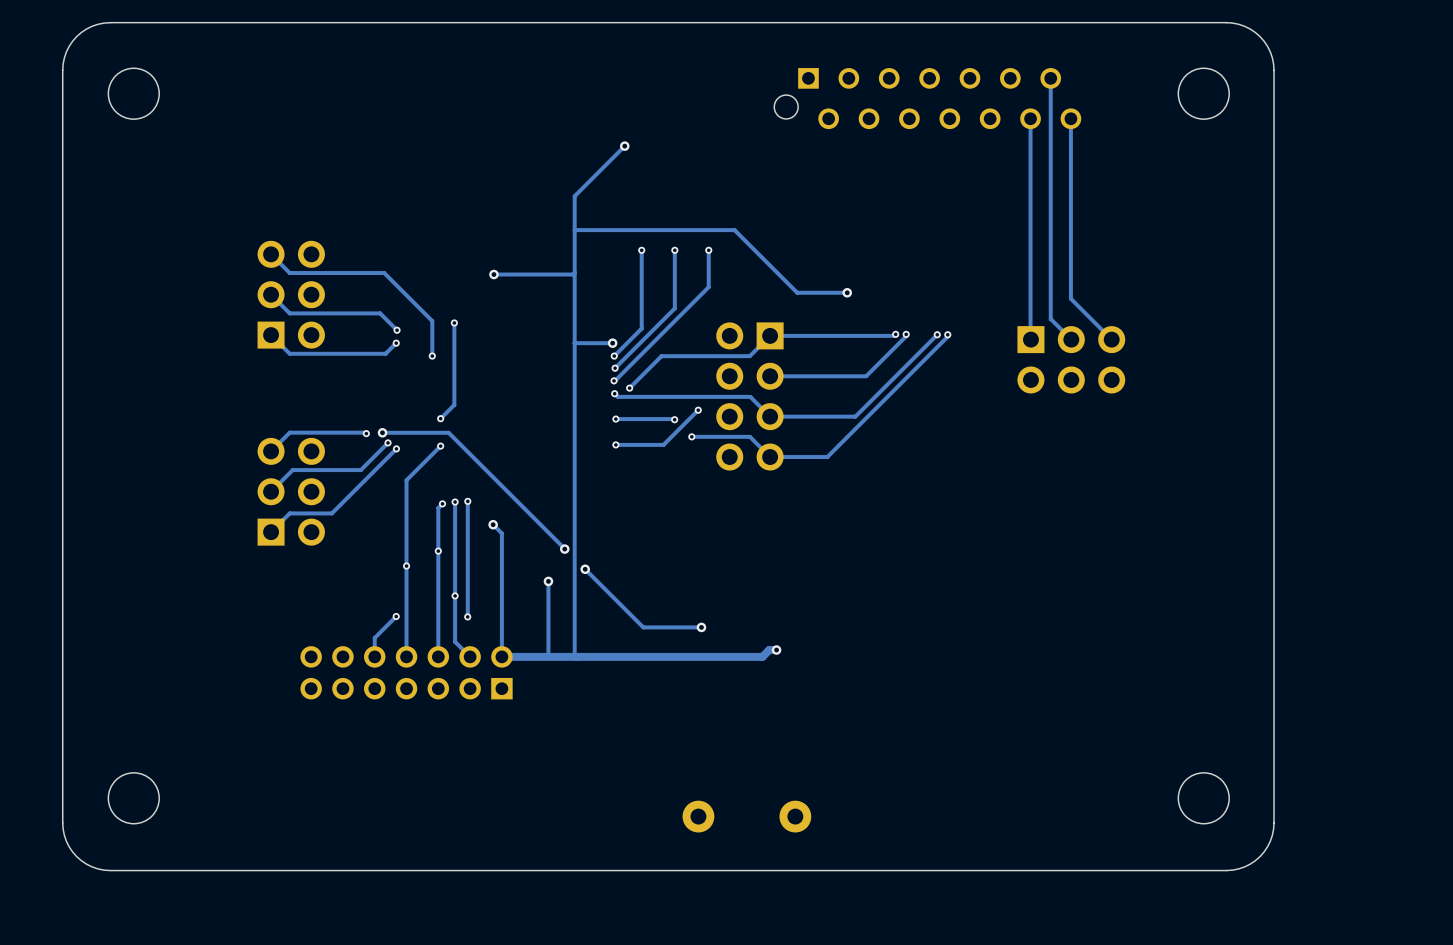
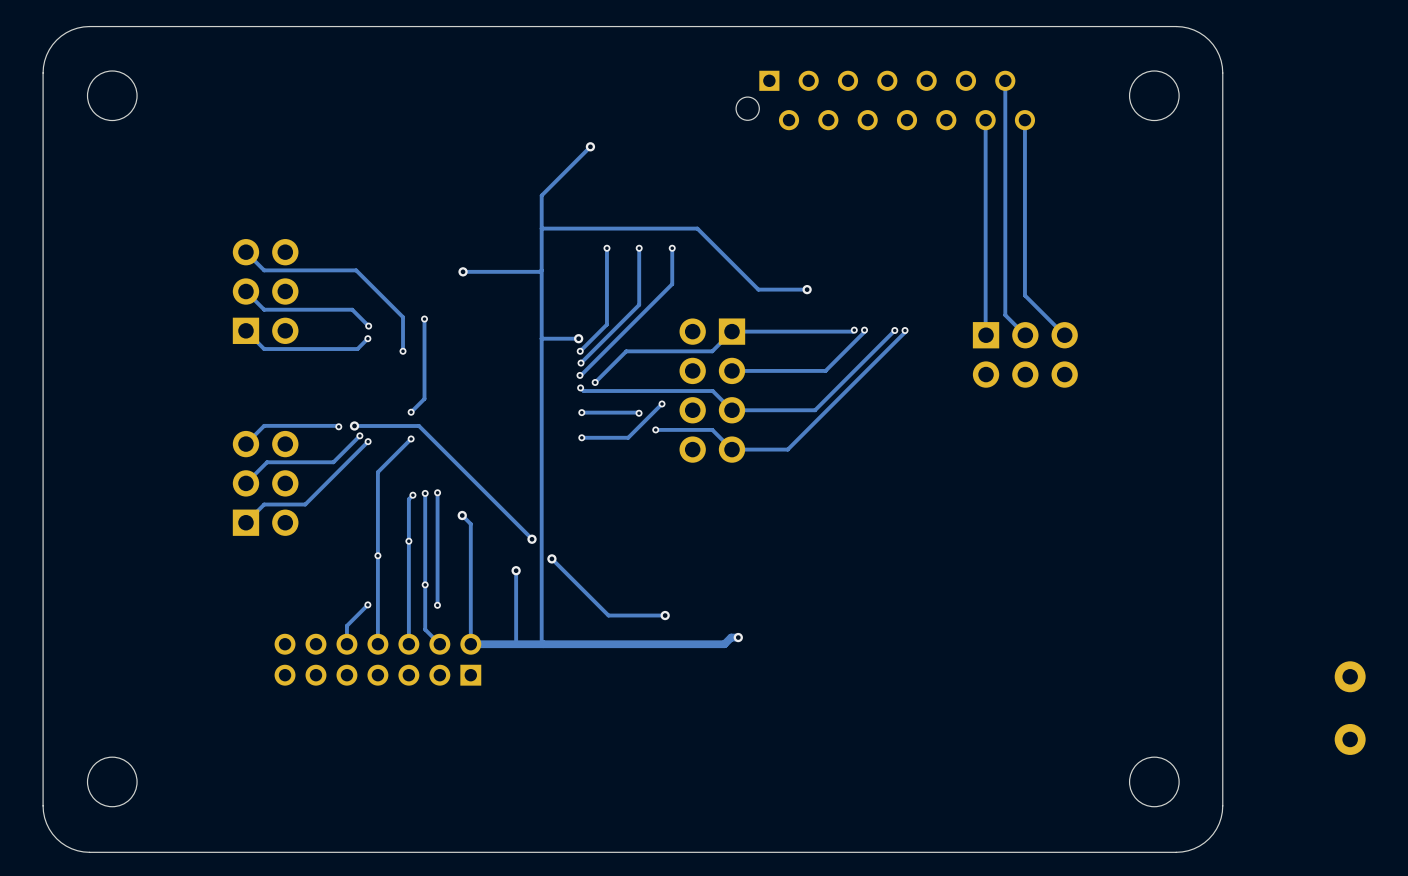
part: none -> (1350, 676)
part: none -> (1350, 739)
part: (698, 816) -> none
part: (795, 816) -> none

